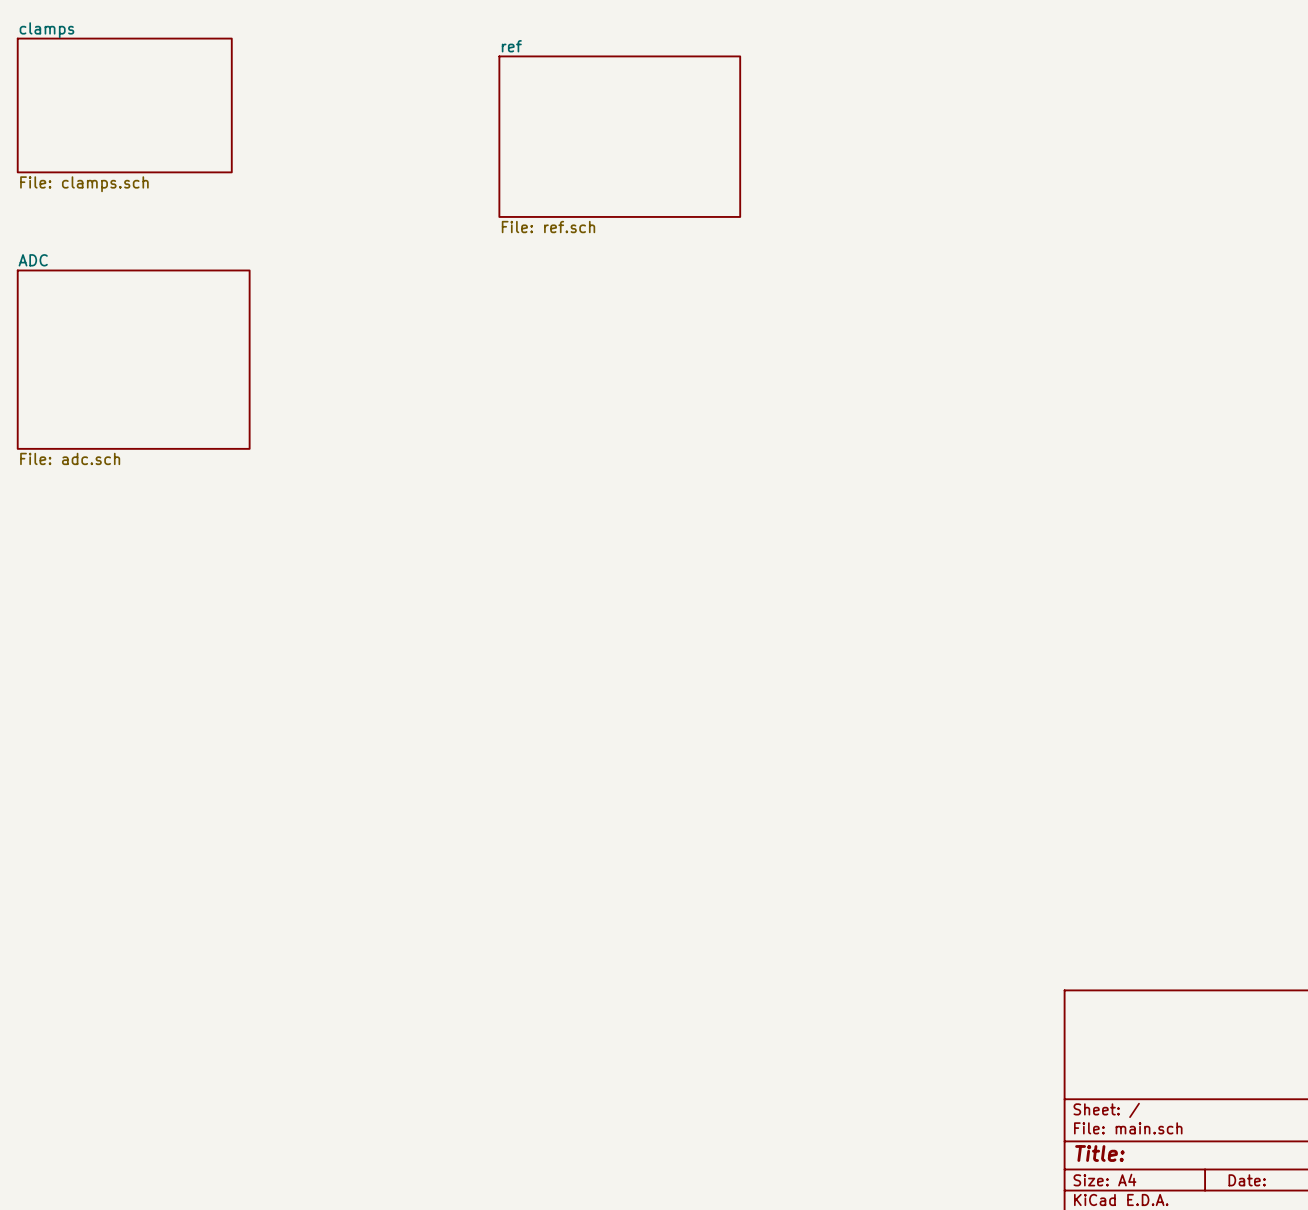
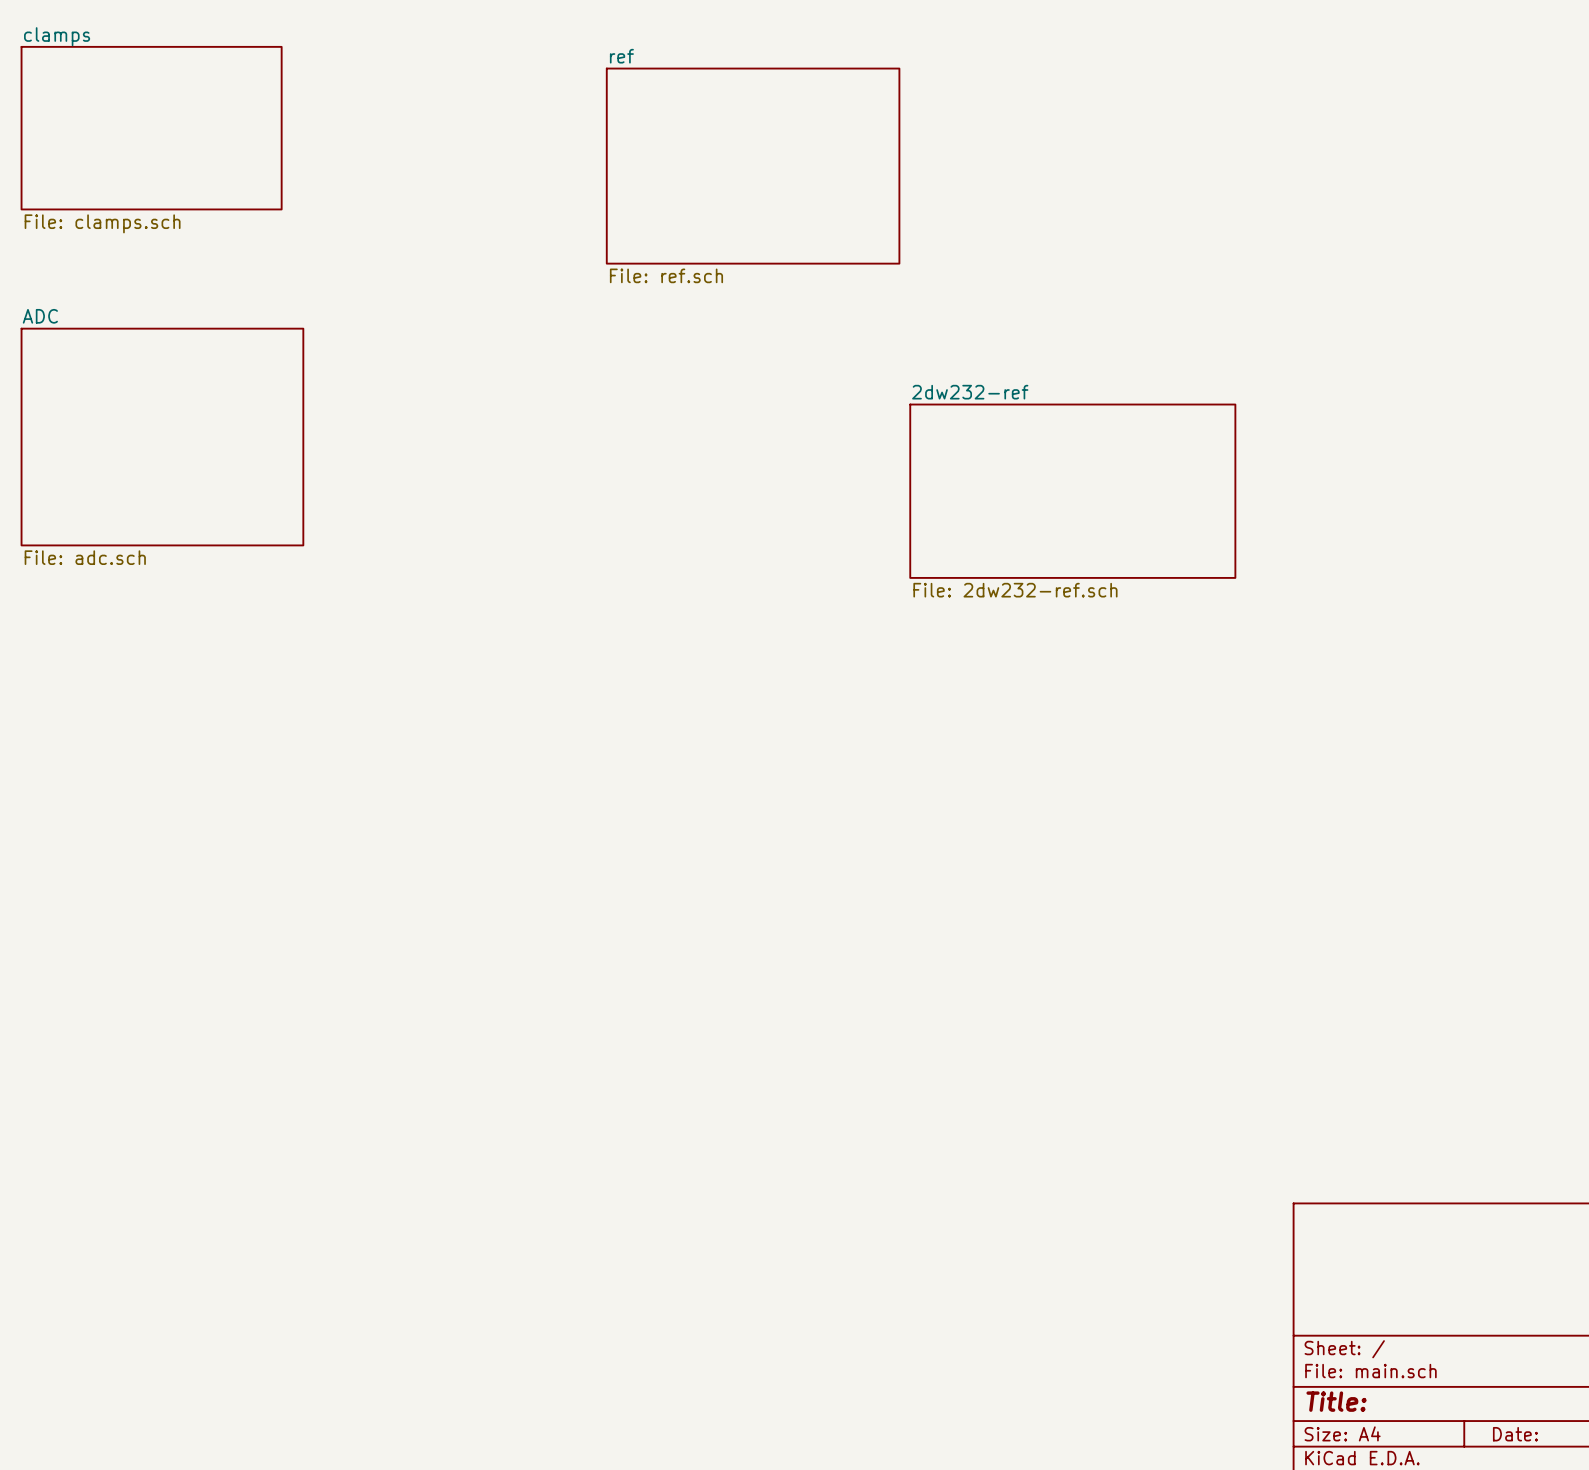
sheet 2dw232-ref: none -> File: 2dw232-ref.sch (1072, 491)

